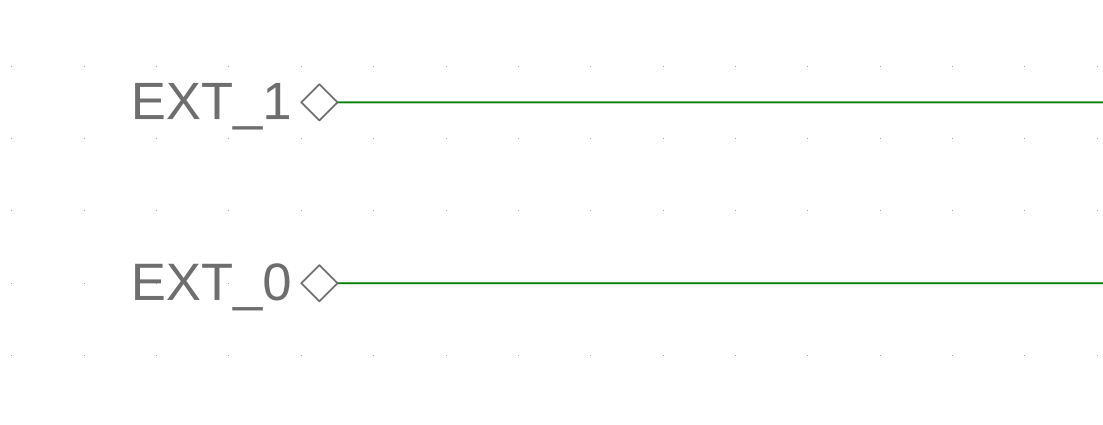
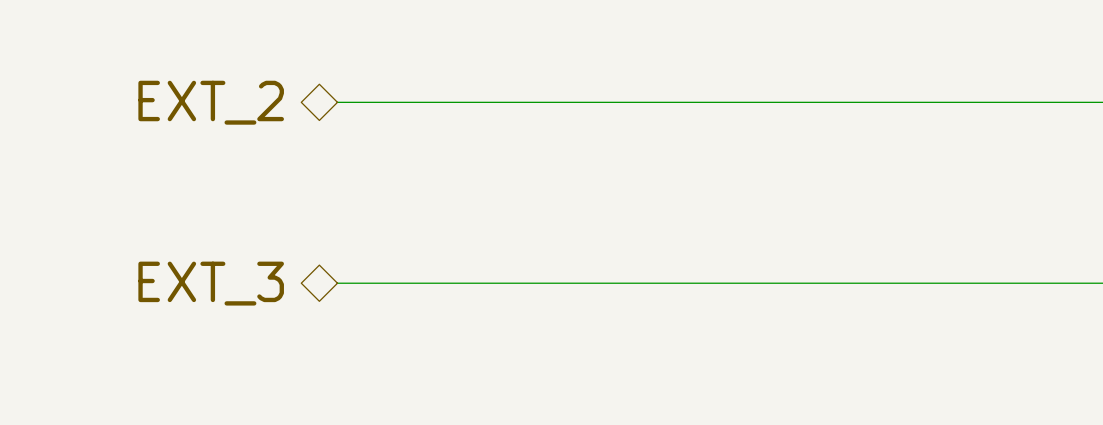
hierarchical label: EXT_1 (212, 106) -> EXT_2 (211, 102)
hierarchical label: EXT_0 (212, 286) -> EXT_3 (211, 283)

